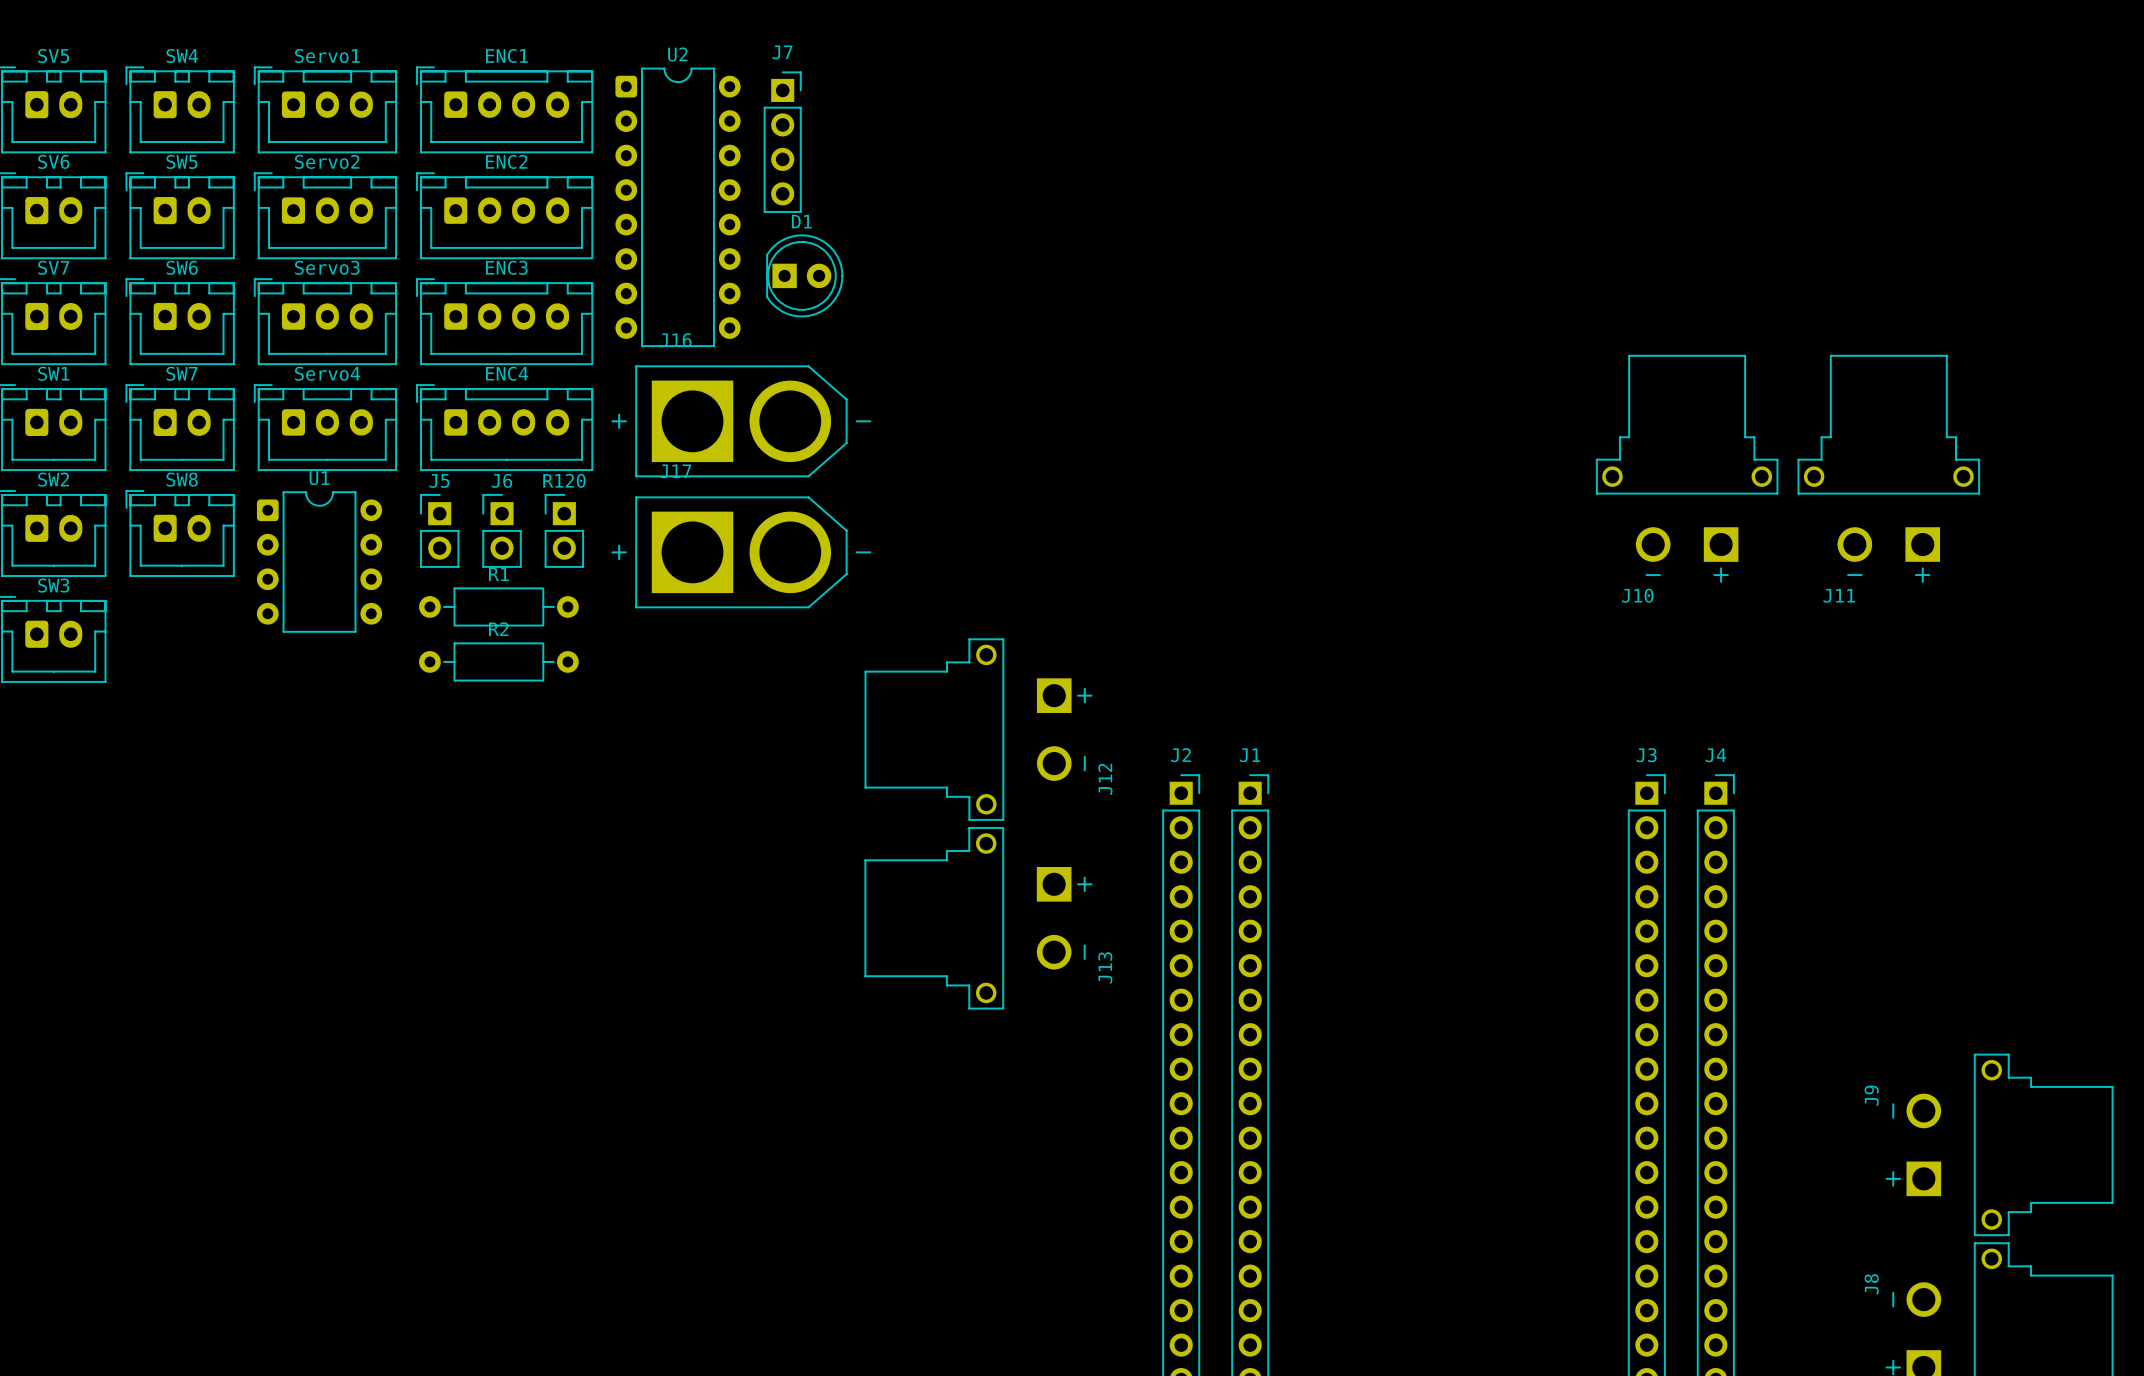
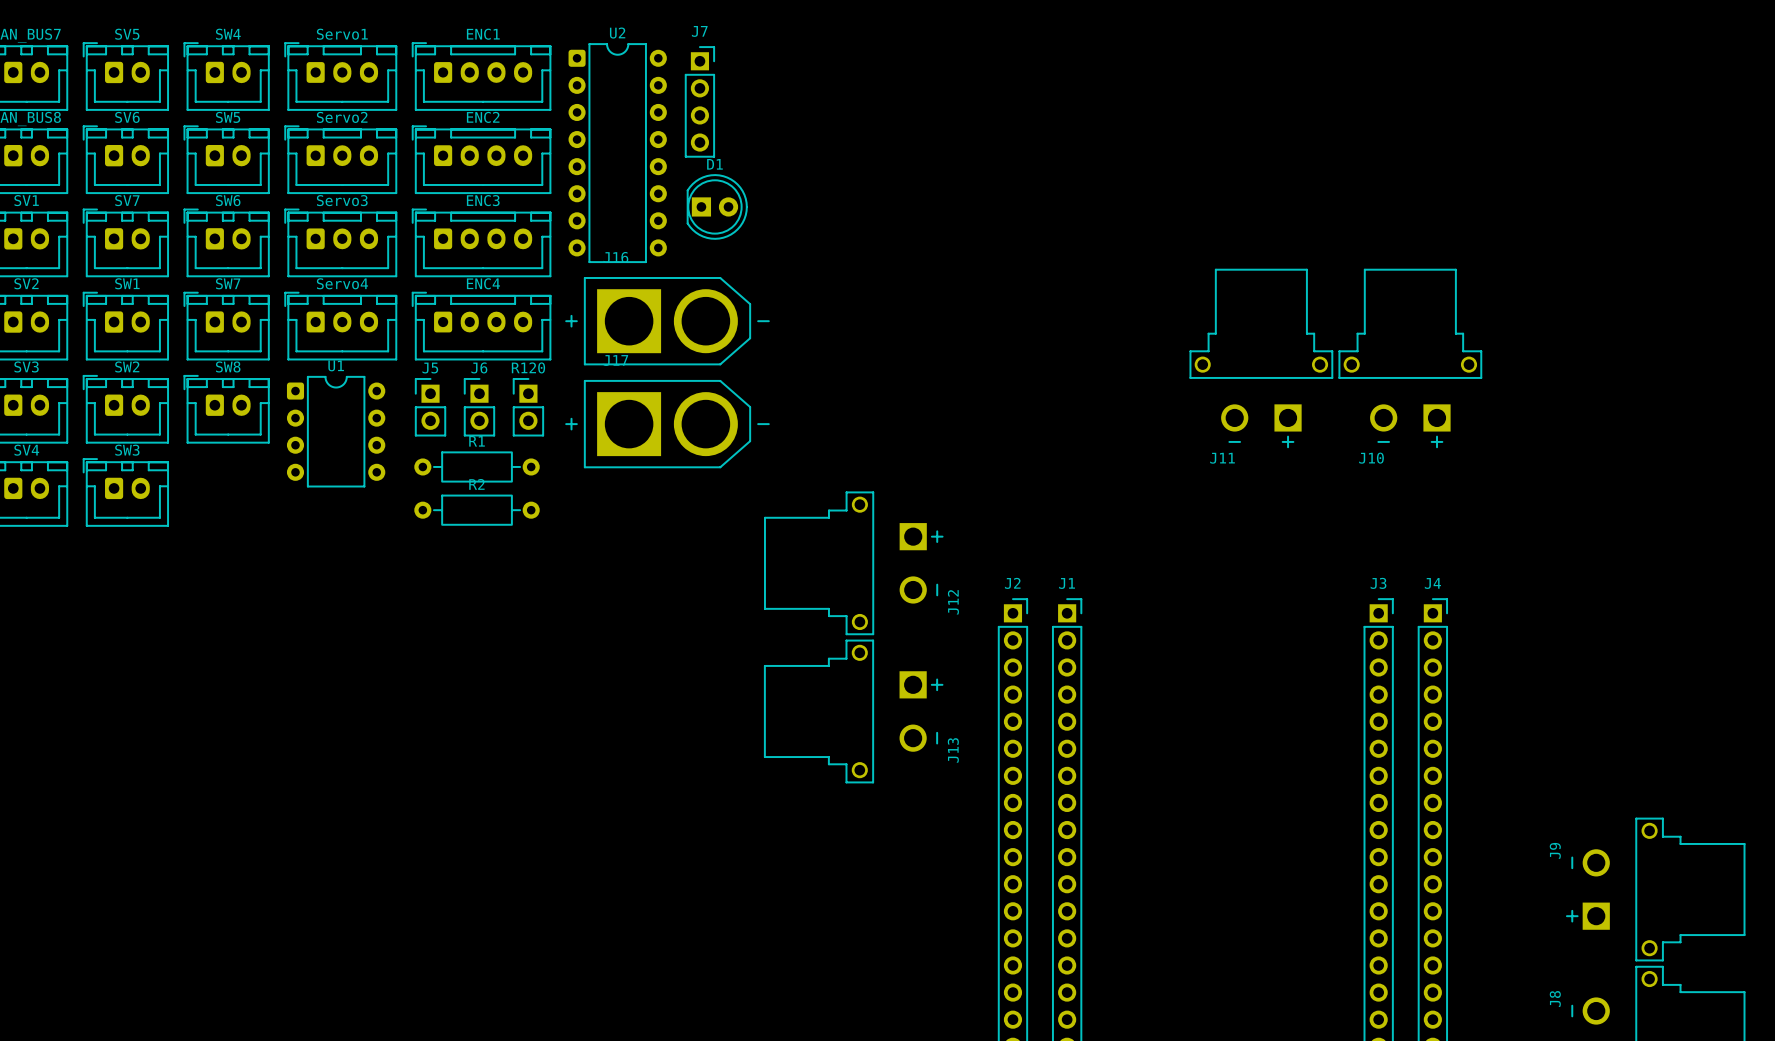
J11 position: (1888, 468) -> (1261, 358)

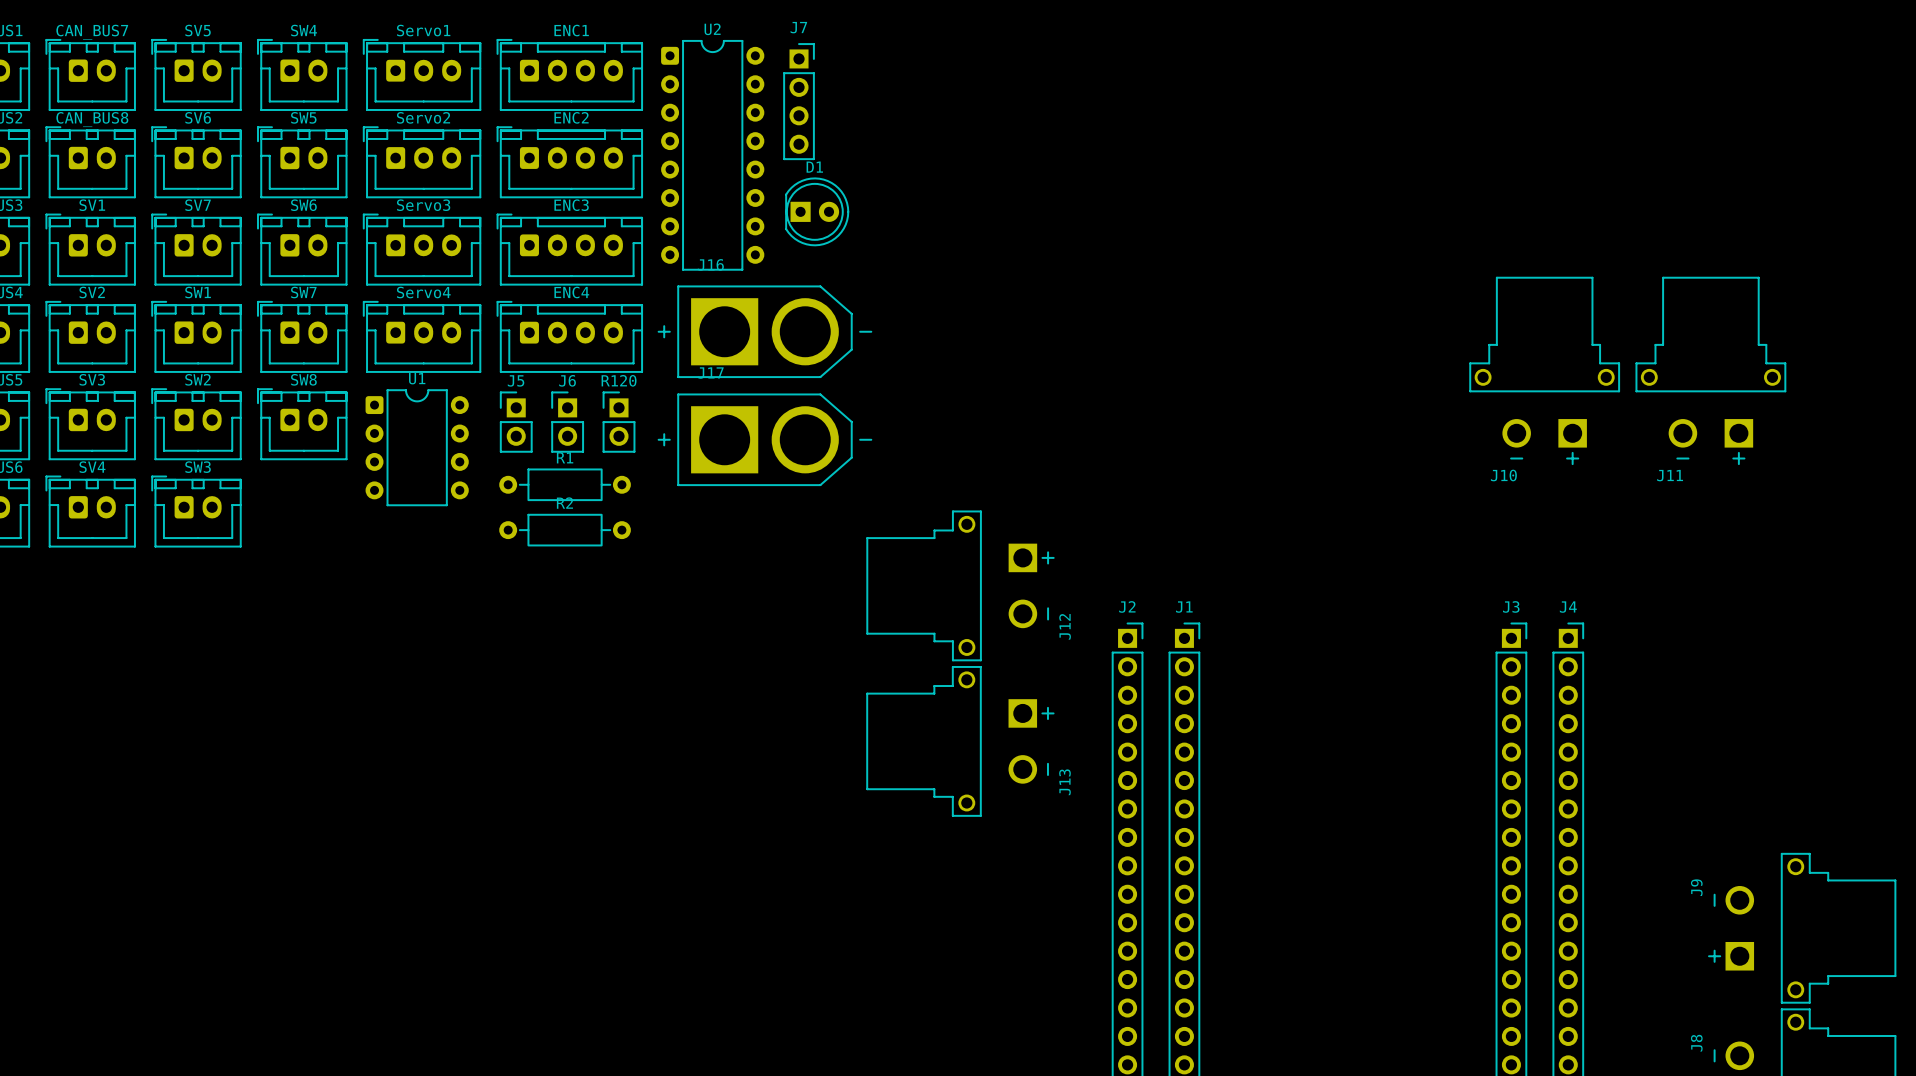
J11 position: (1261, 358) -> (1710, 370)

